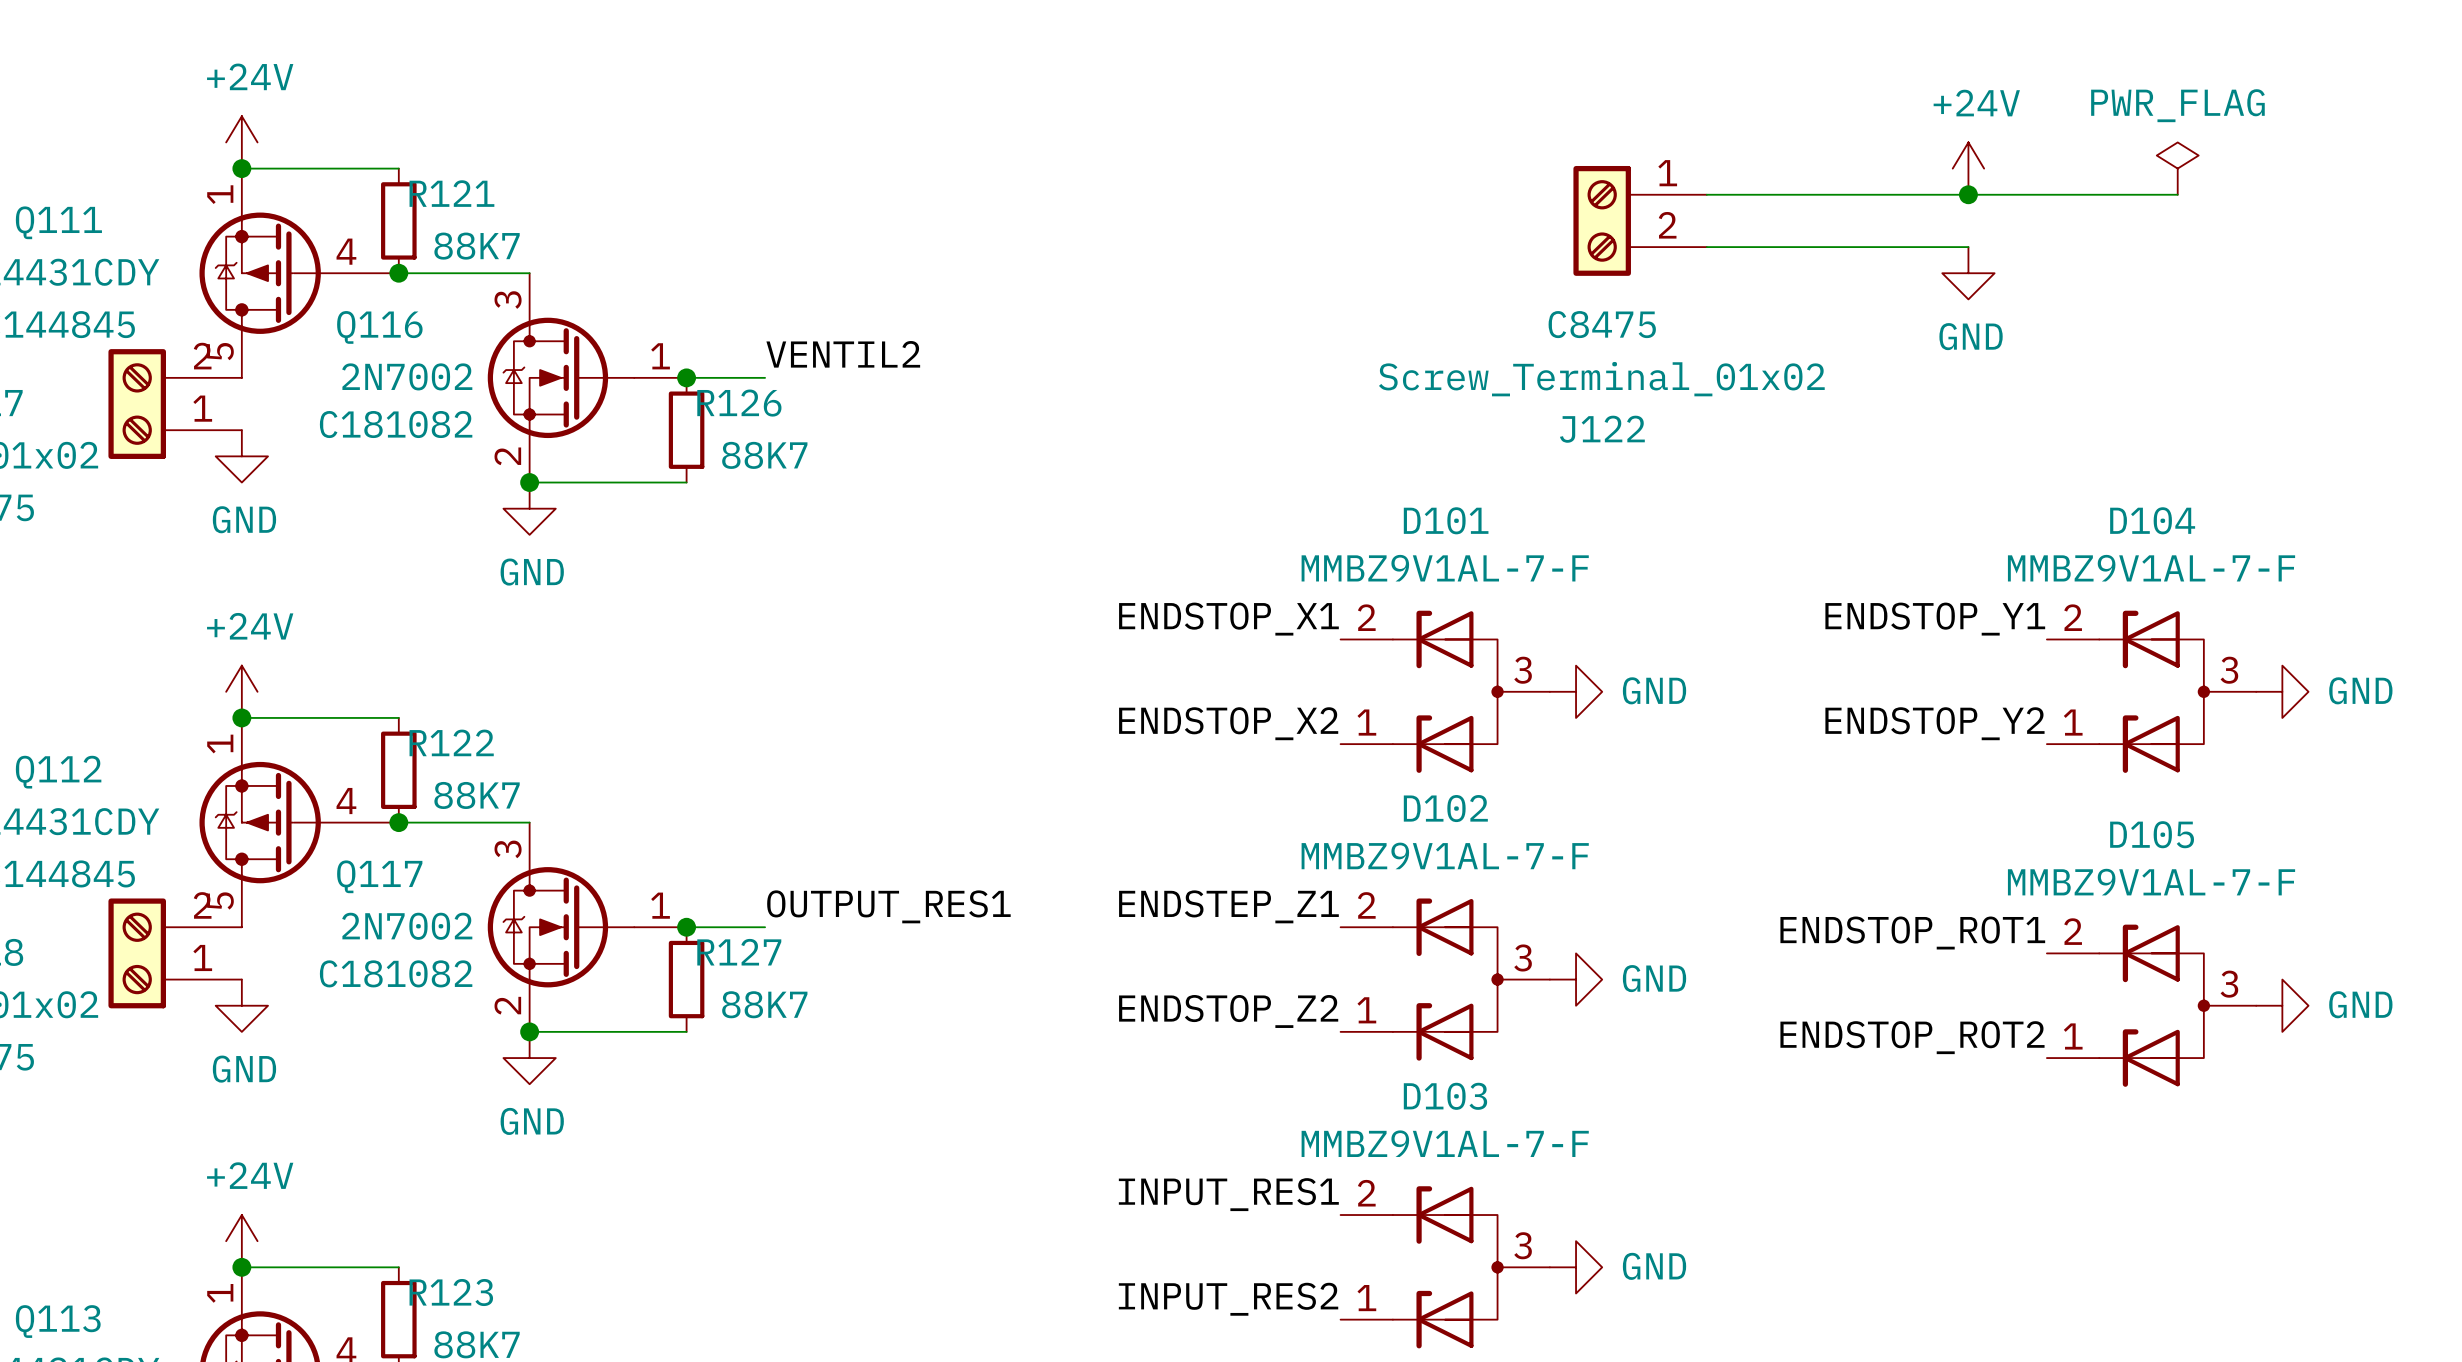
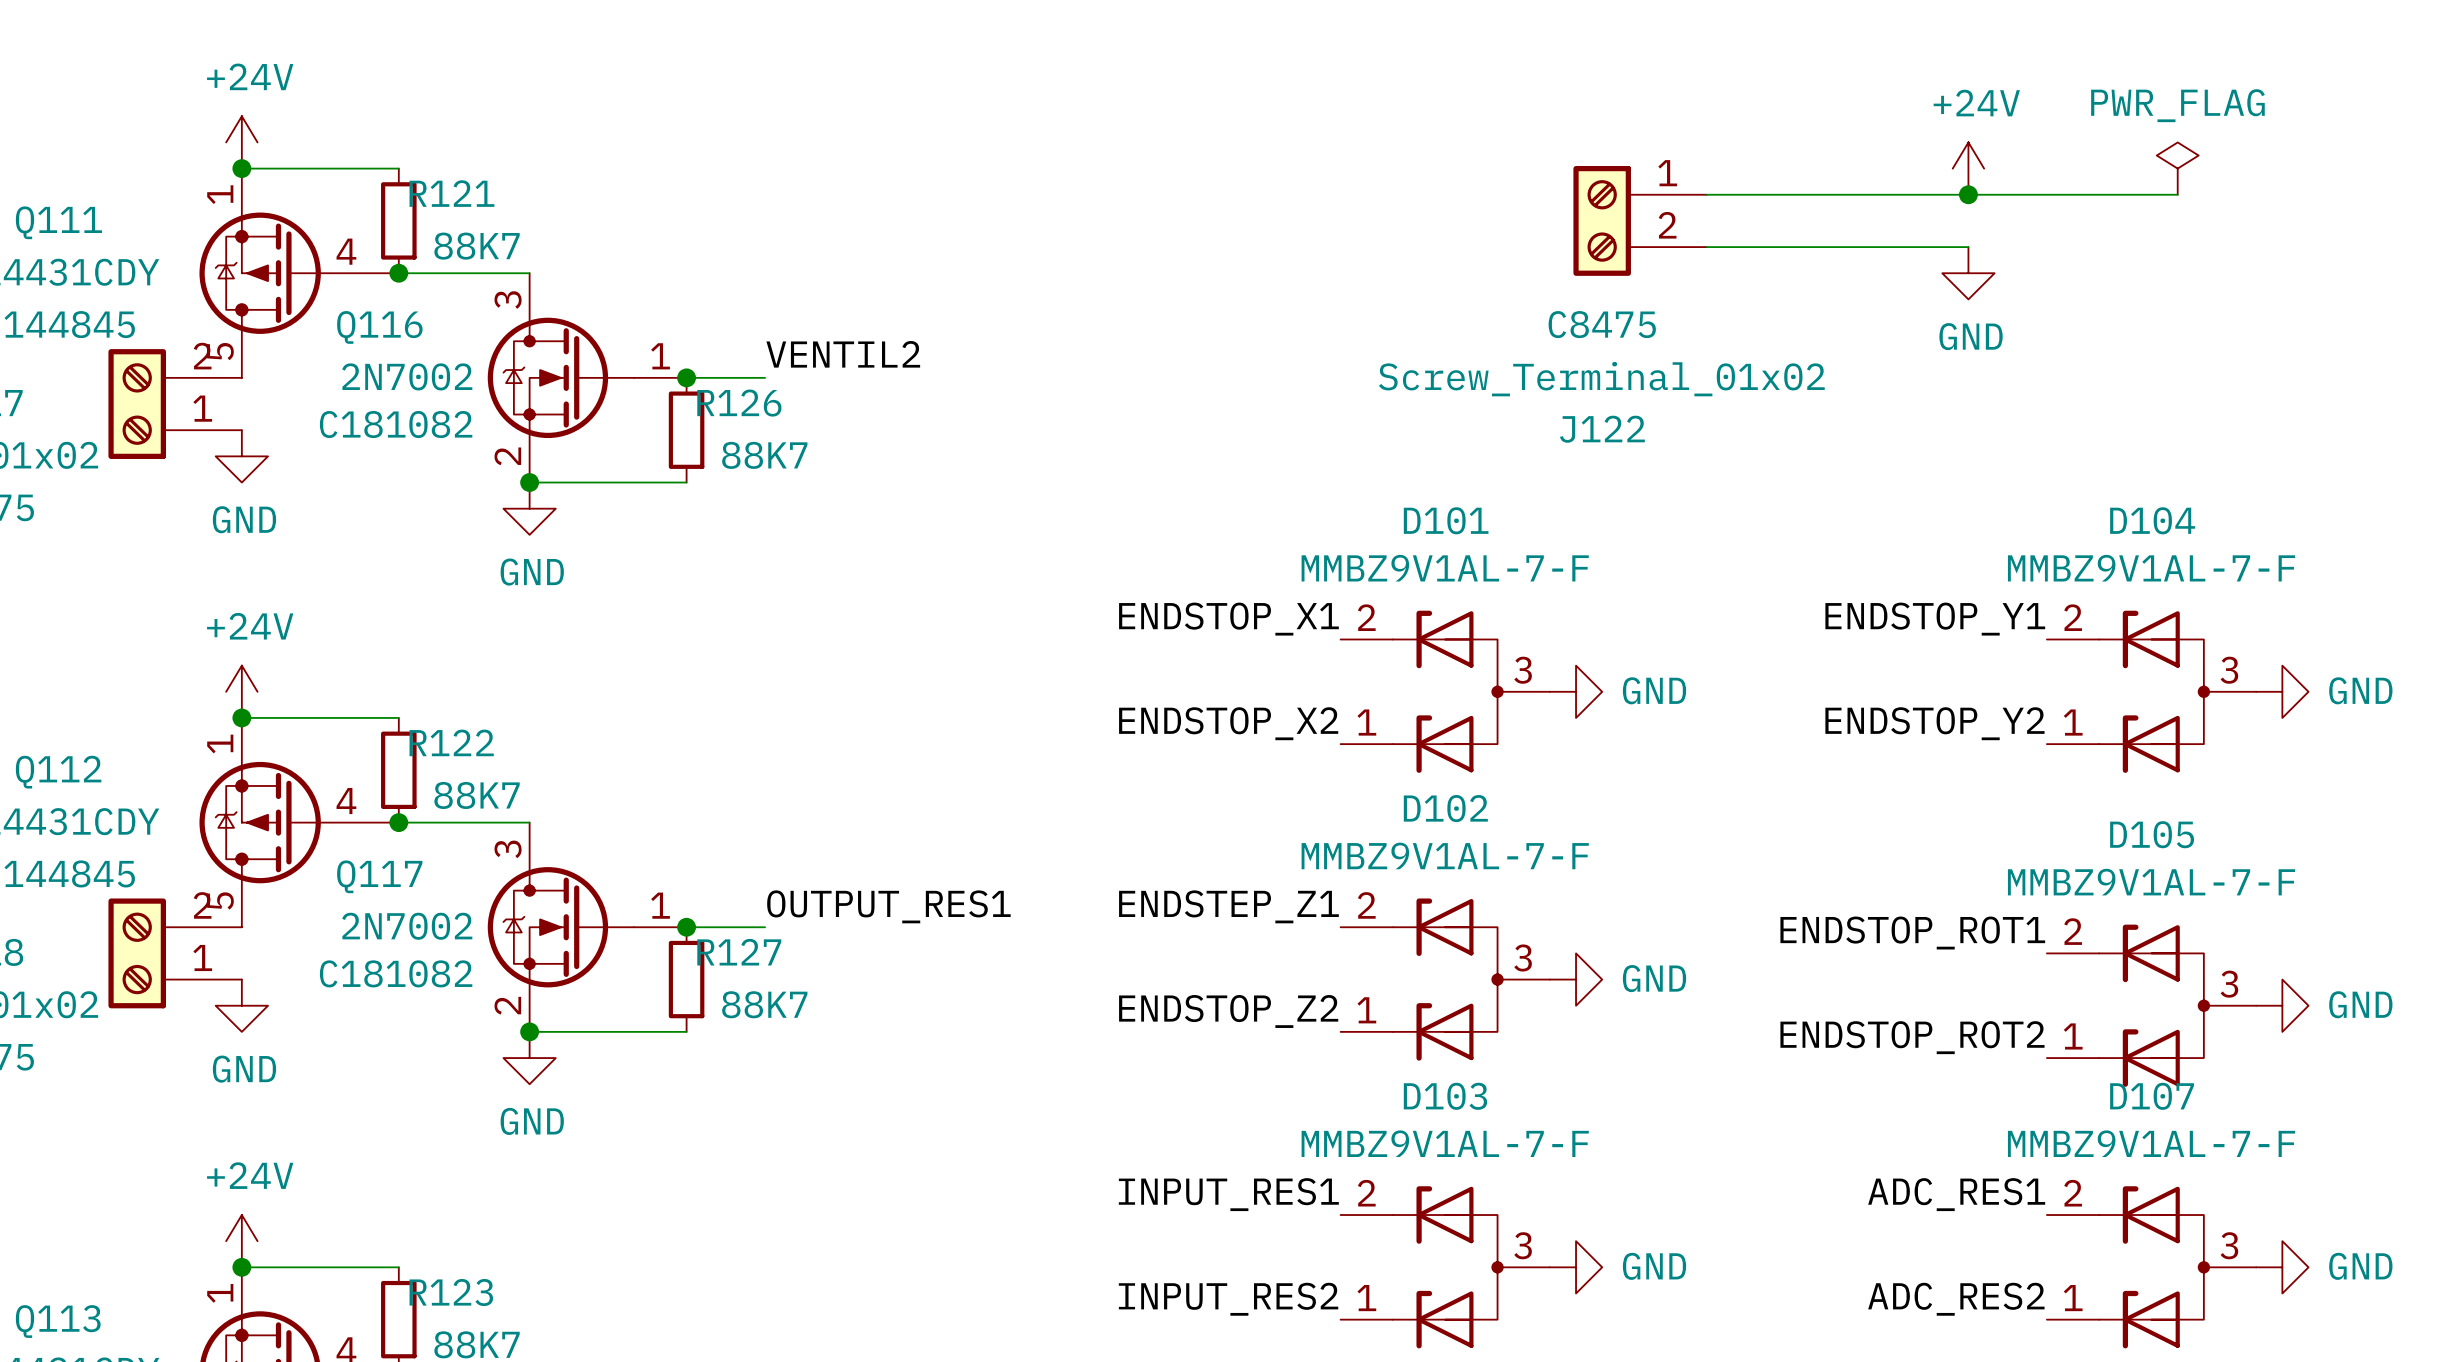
label: none -> ADC_RES1 (1956, 1194)
D107: none -> MMBZ9V1AL-7-F (2151, 1267)
power symbol: none -> GND (2282, 1267)
label: none -> ADC_RES2 (1956, 1299)

